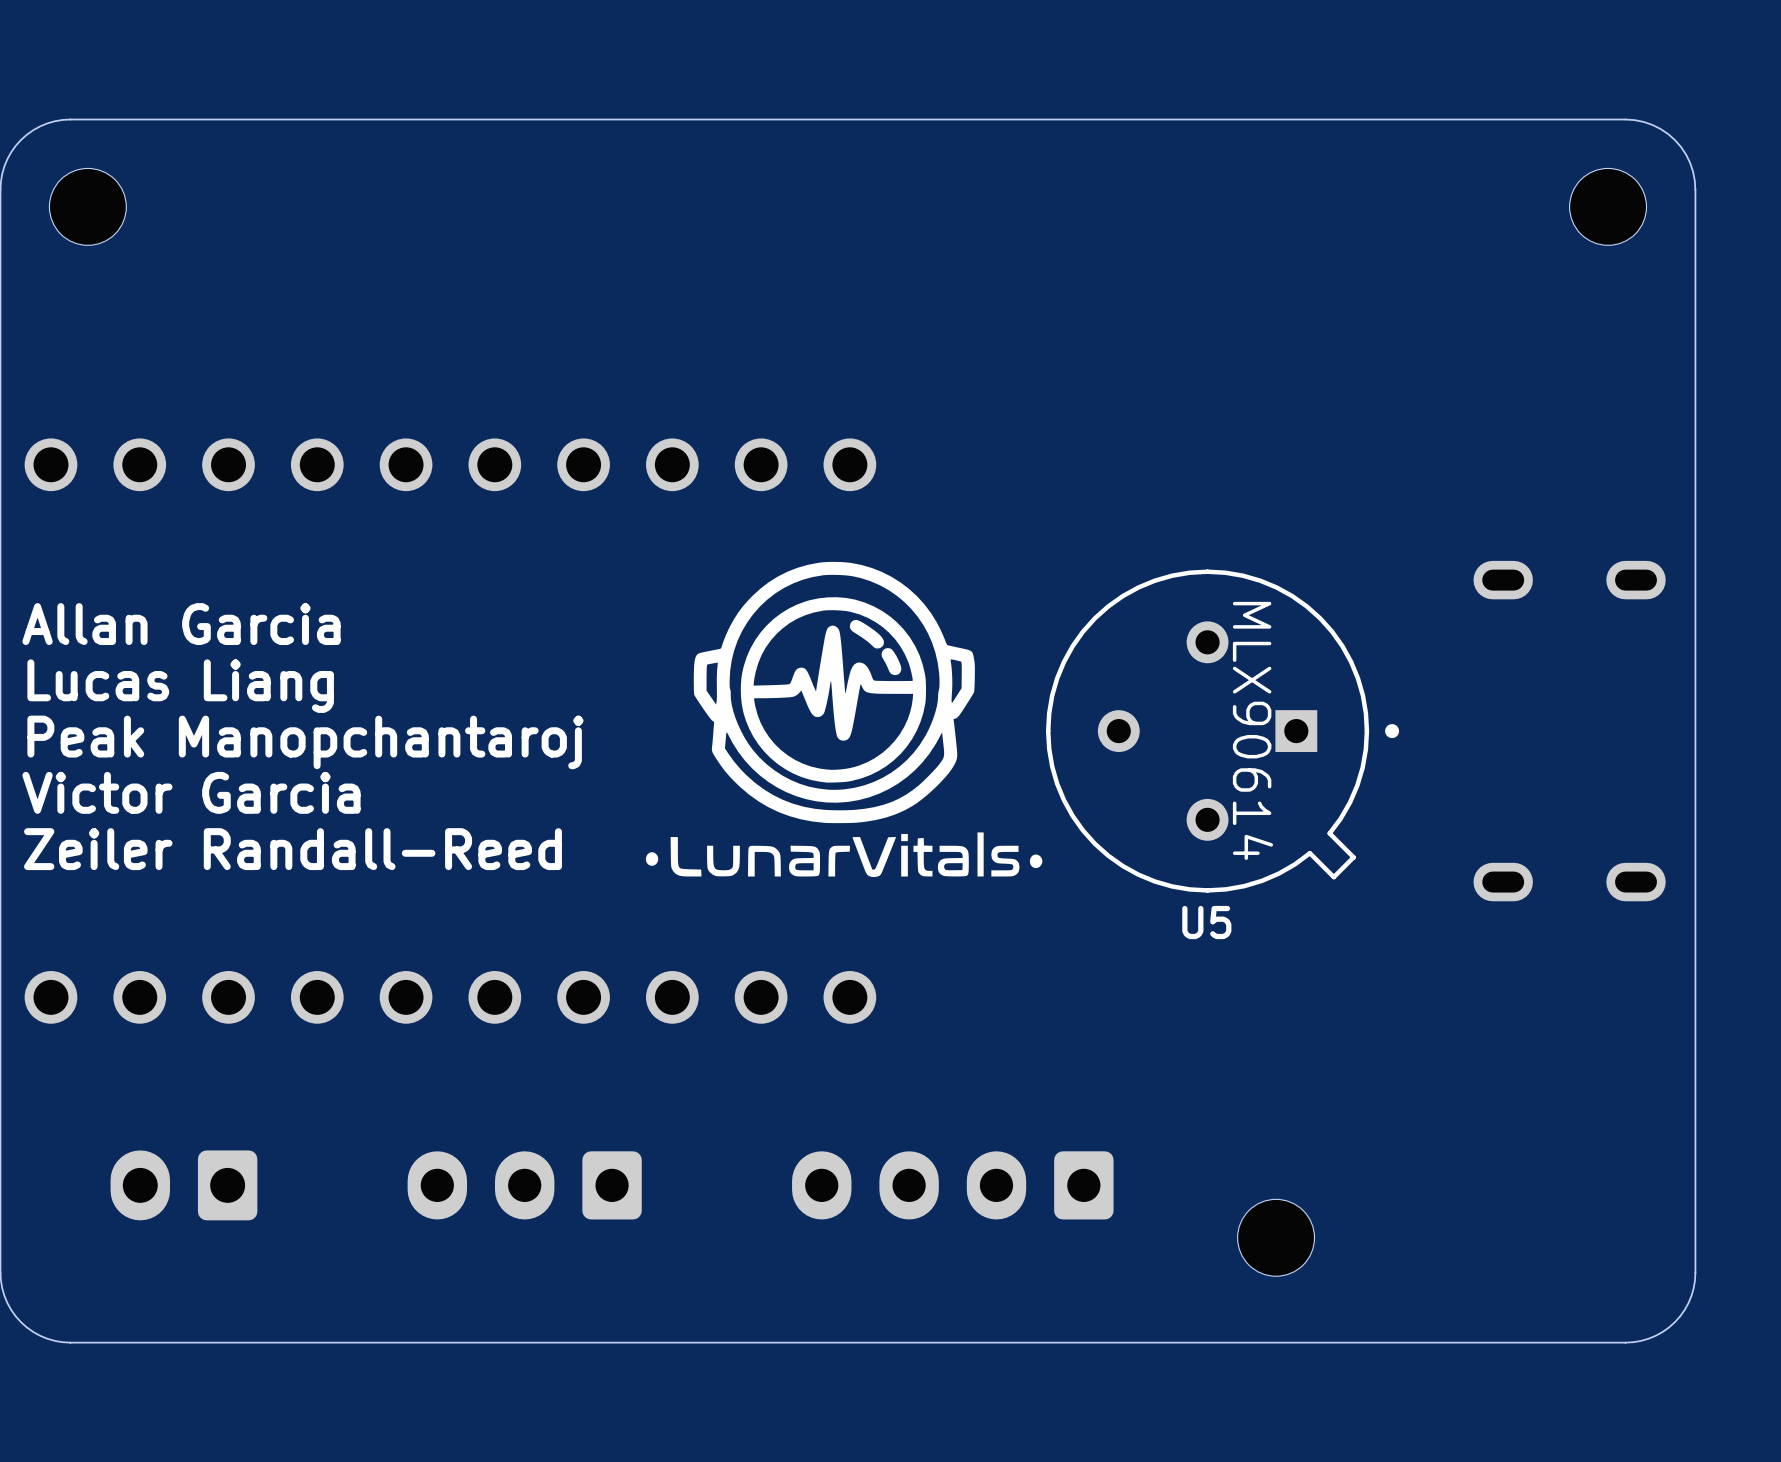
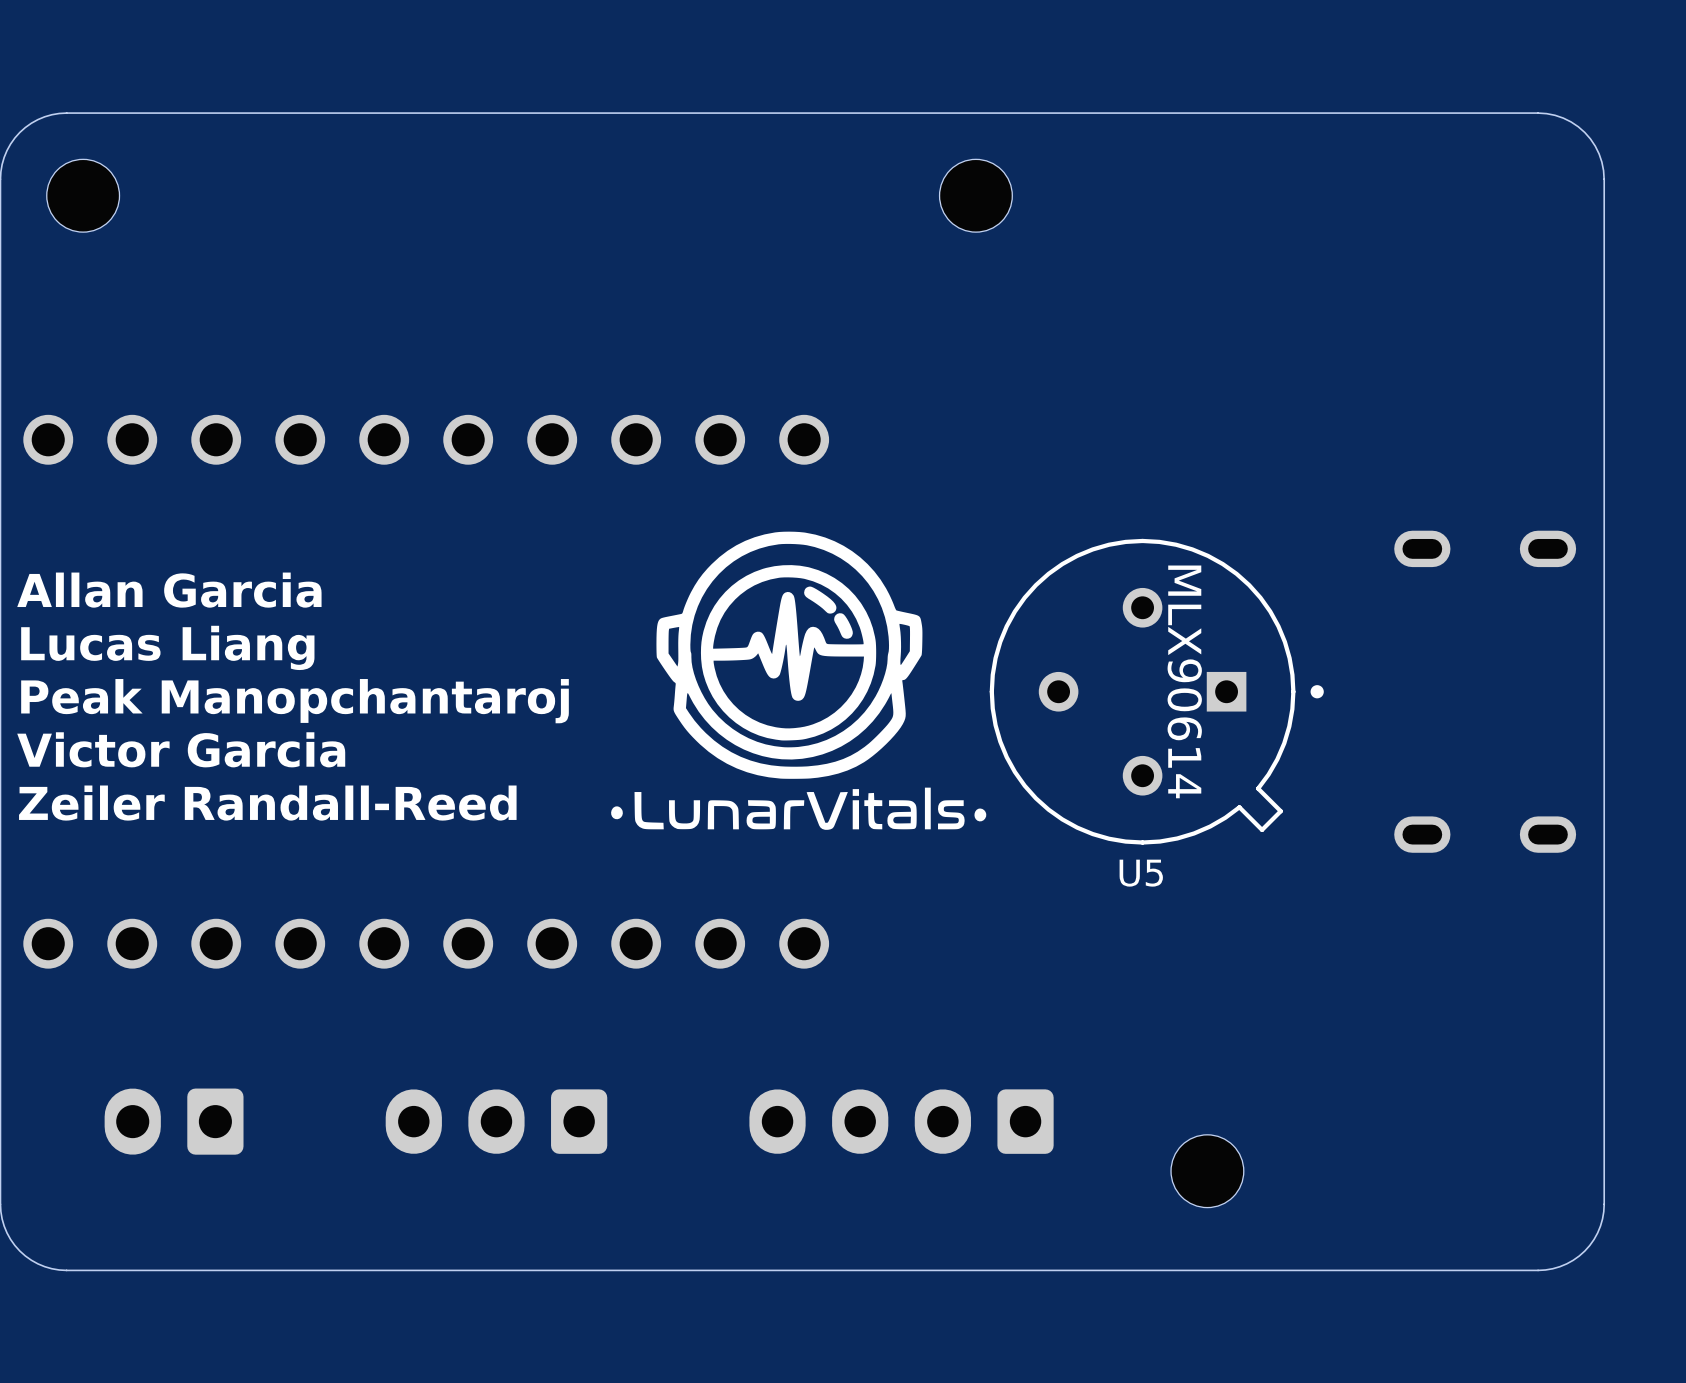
part position: (1608, 206) -> (975, 195)

